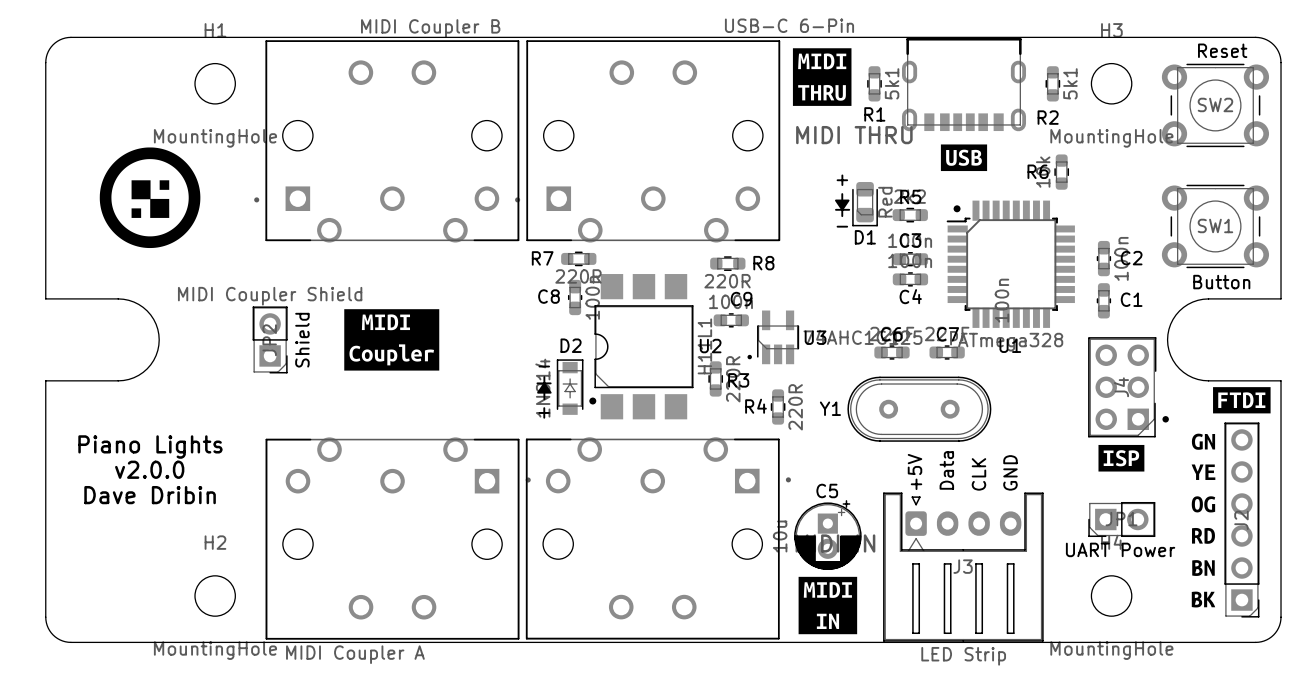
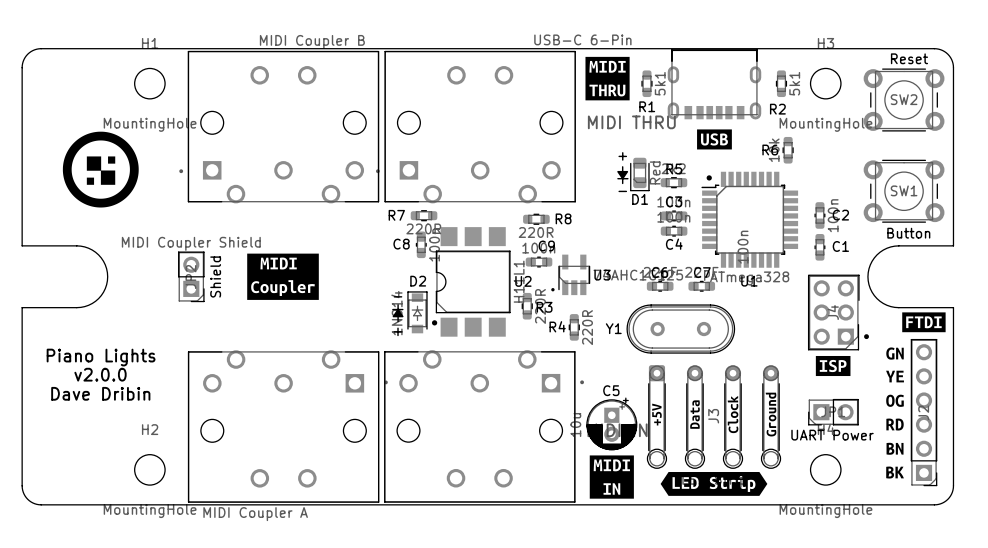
text: Data (946, 470) -> none
text: +5V (915, 471) -> none
text: GND (1010, 472) -> none
text: CLK (978, 474) -> none
J3 footprint: [883, 492, 1044, 642] -> [647, 365, 781, 469]
drawing: none -> [765, 392, 777, 437]
drawing: none -> [727, 396, 739, 434]
drawing: none -> [690, 400, 700, 429]
drawing: none -> [652, 403, 662, 426]
drawing: none -> [660, 472, 768, 496]

